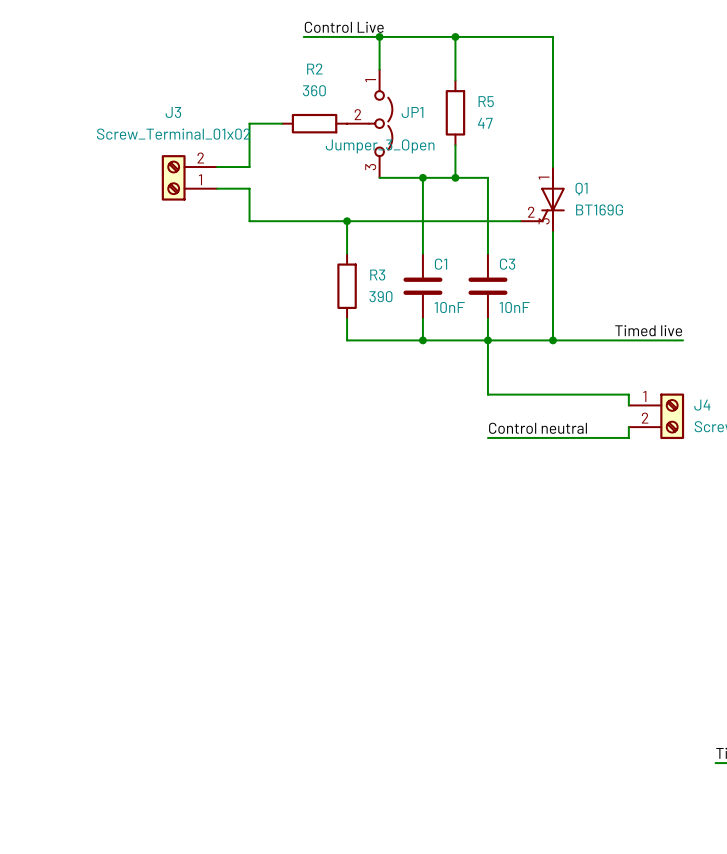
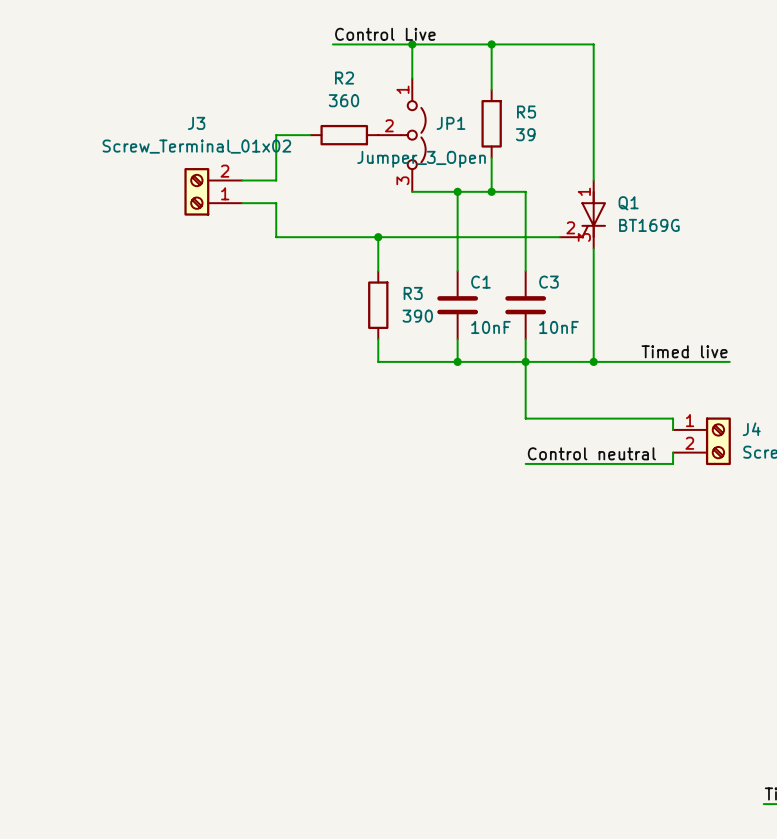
R5 value: 47 (485, 123) -> 39 (525, 134)

